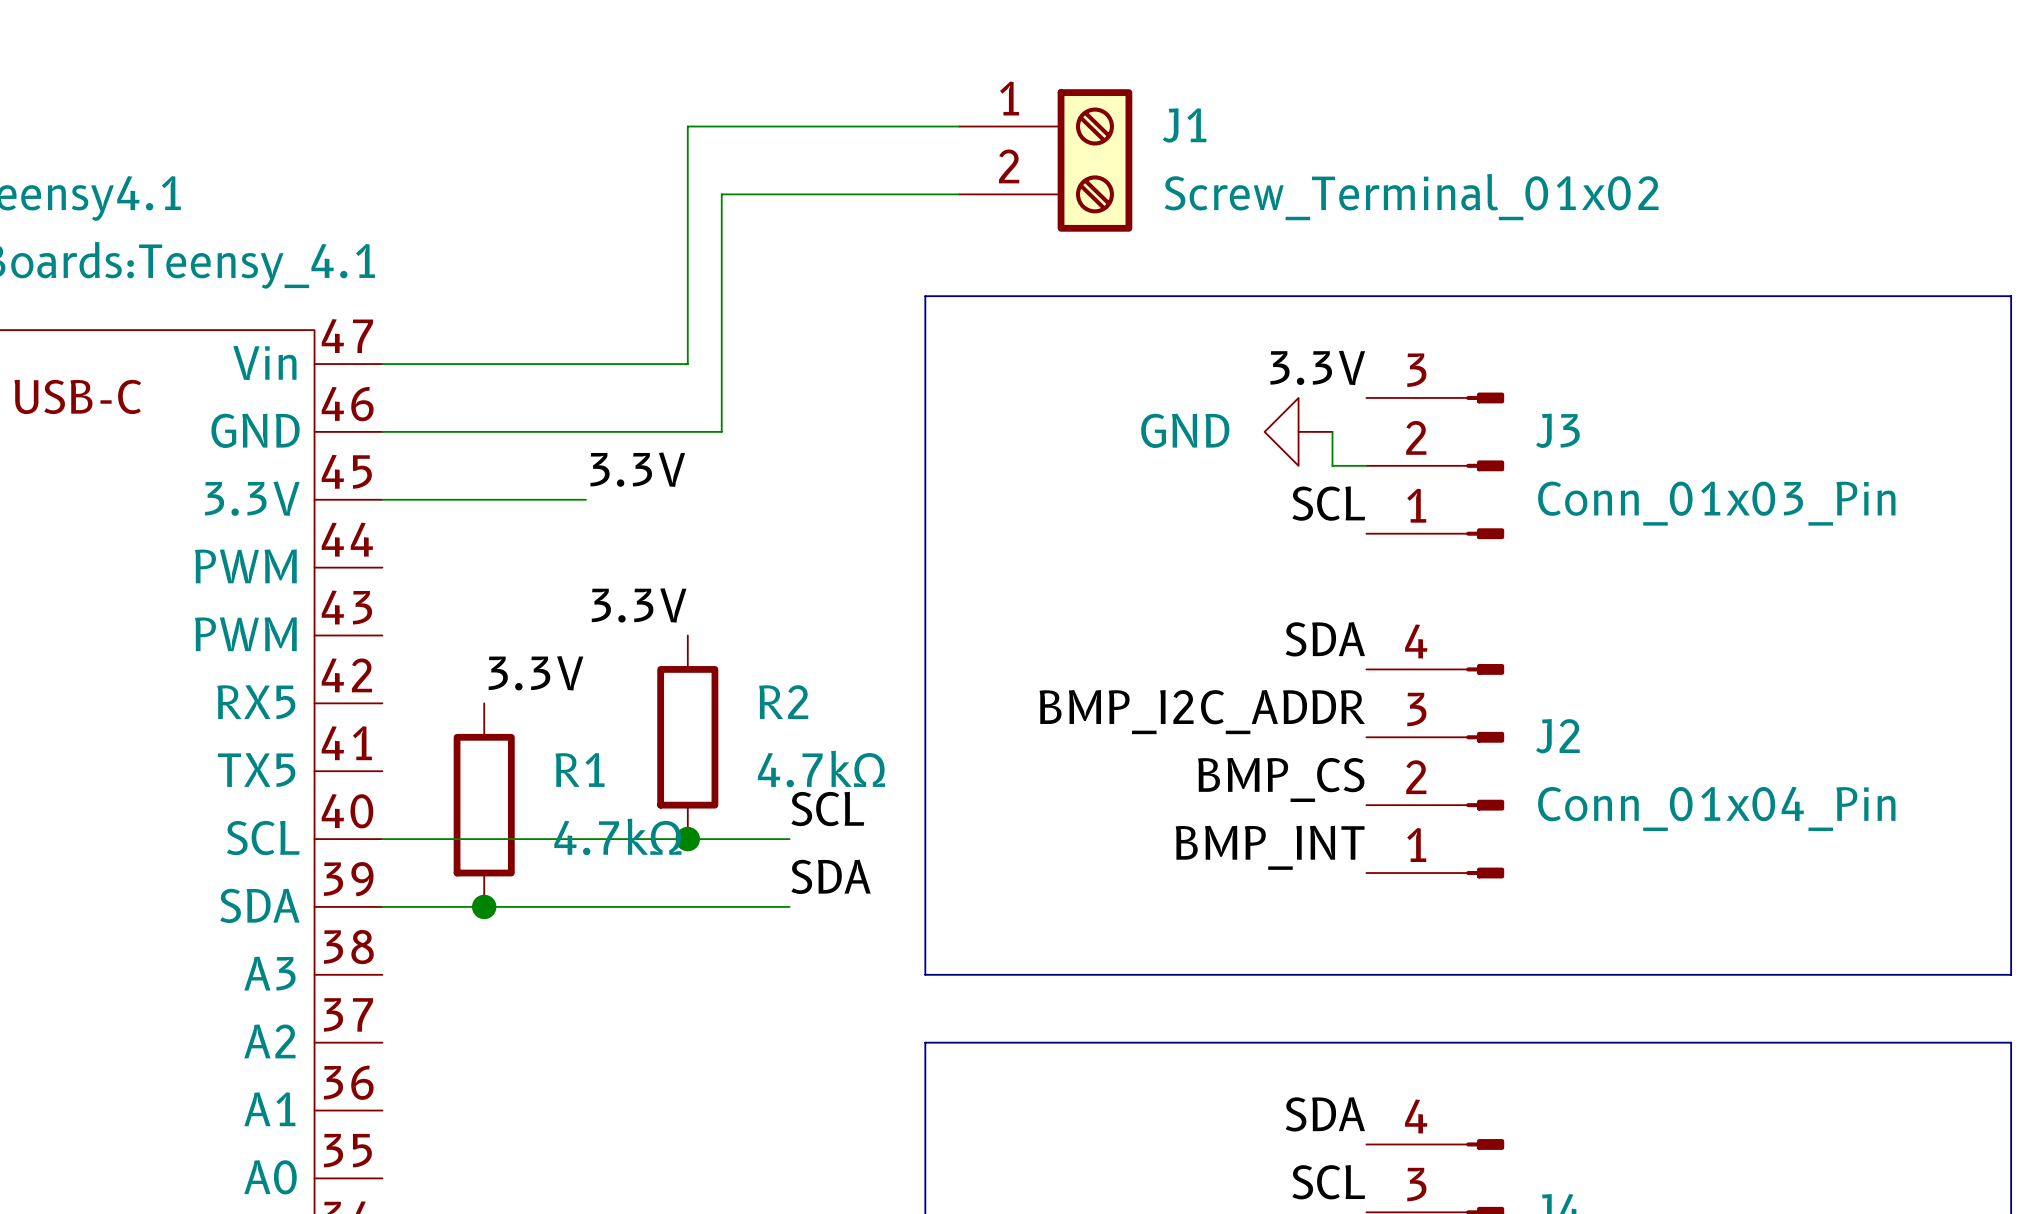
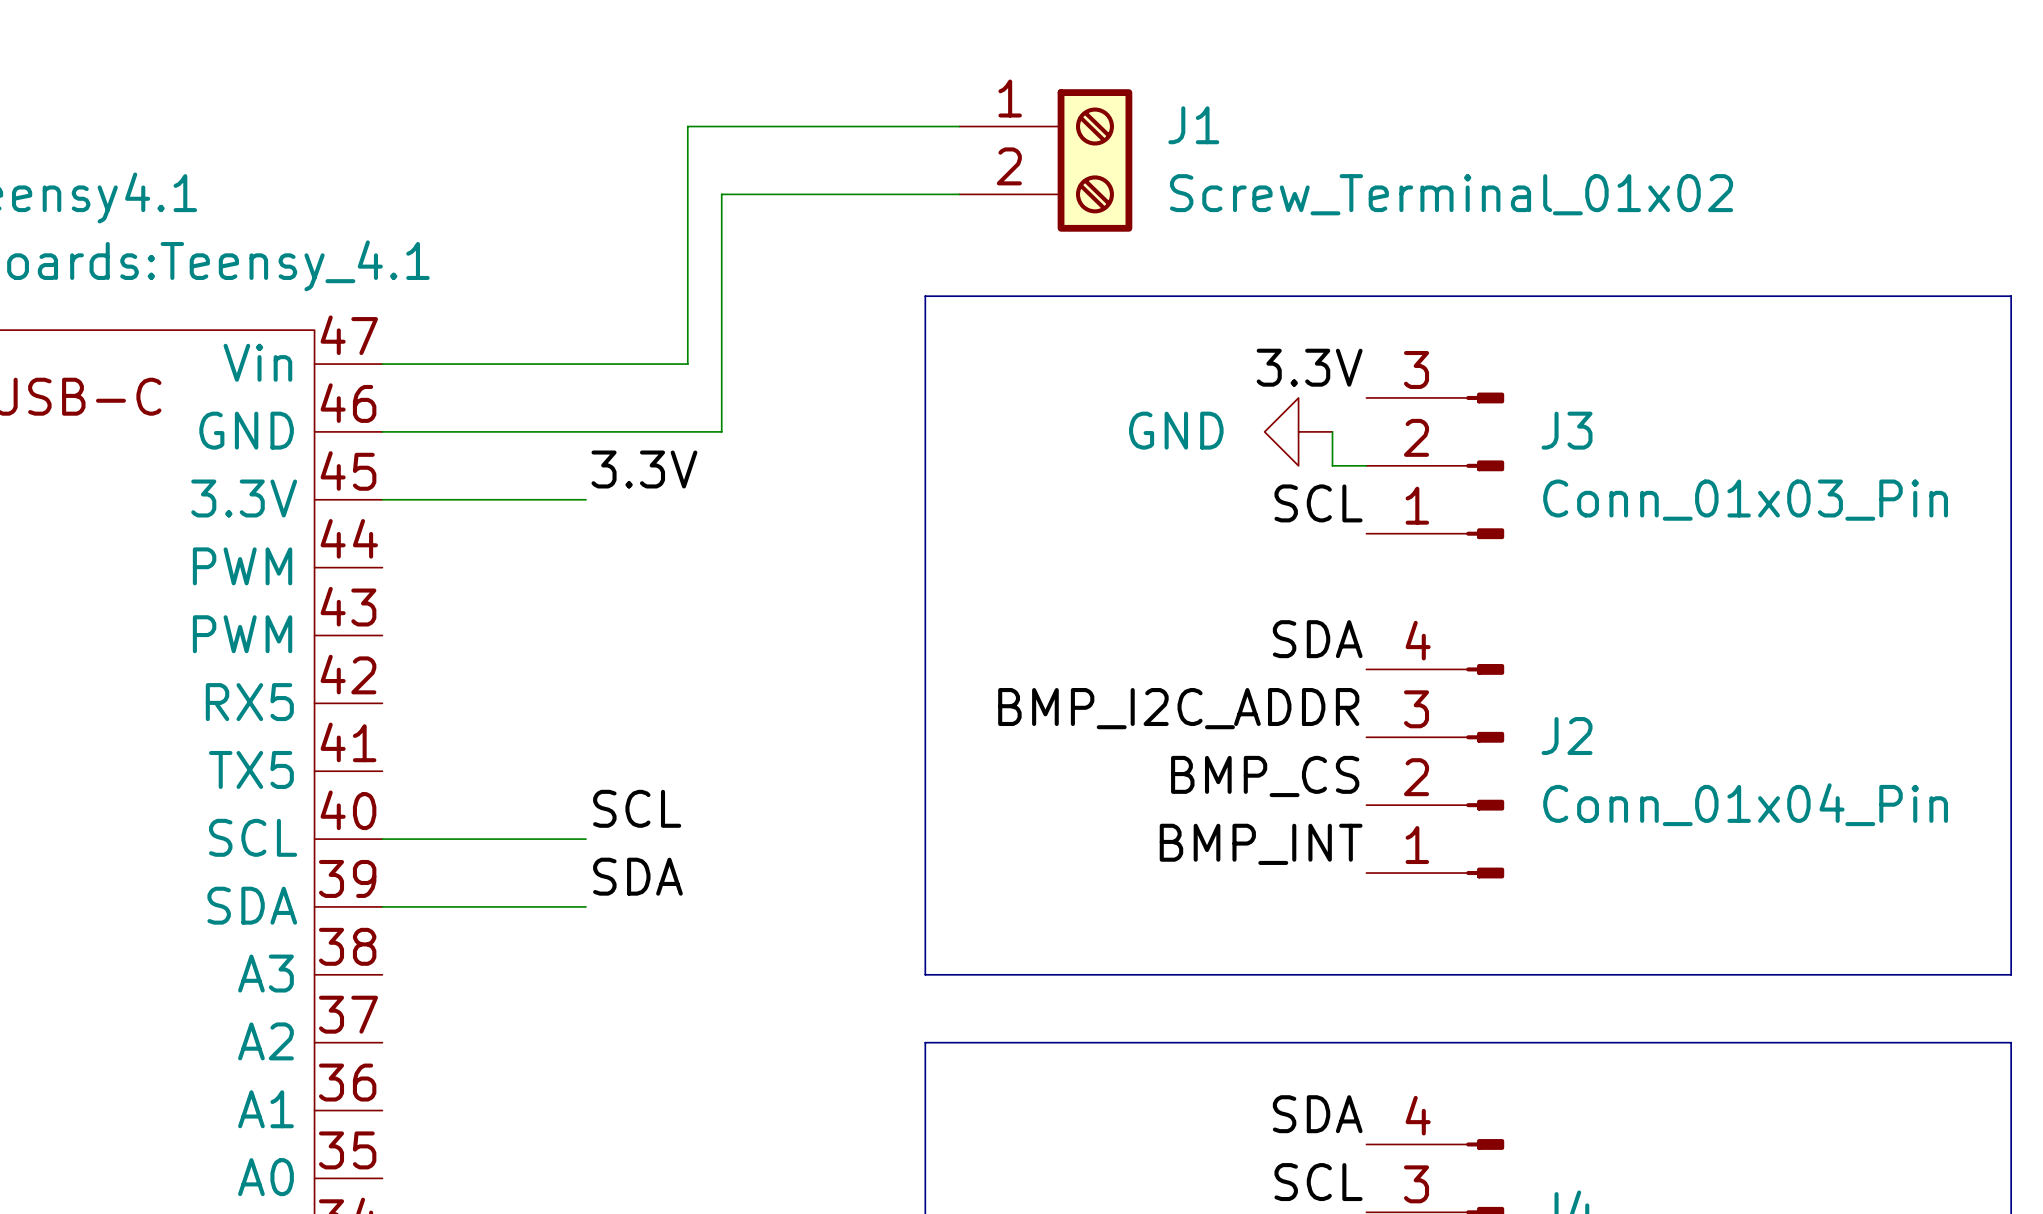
label: 3.3V (639, 605) -> none
label: 3.3V (536, 673) -> none
R2: 4.7kΩ (687, 737) -> none
R1: 4.7kΩ (484, 805) -> none
label position: SCL (827, 808) -> SCL (637, 808)
wire: (586, 839) (789, 839) -> none
junction: (687, 839) -> none
label position: SDA (831, 876) -> SDA (637, 876)
junction: (484, 906) -> none
wire: (586, 906) (789, 906) -> none

